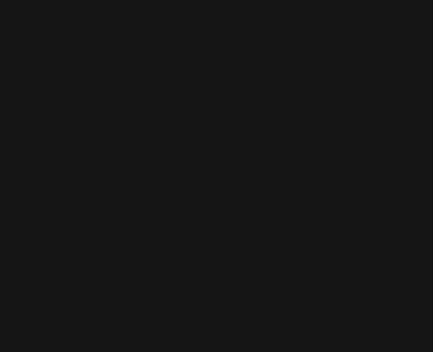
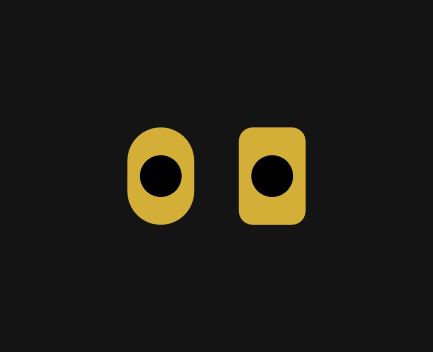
part: none -> (216, 176)

